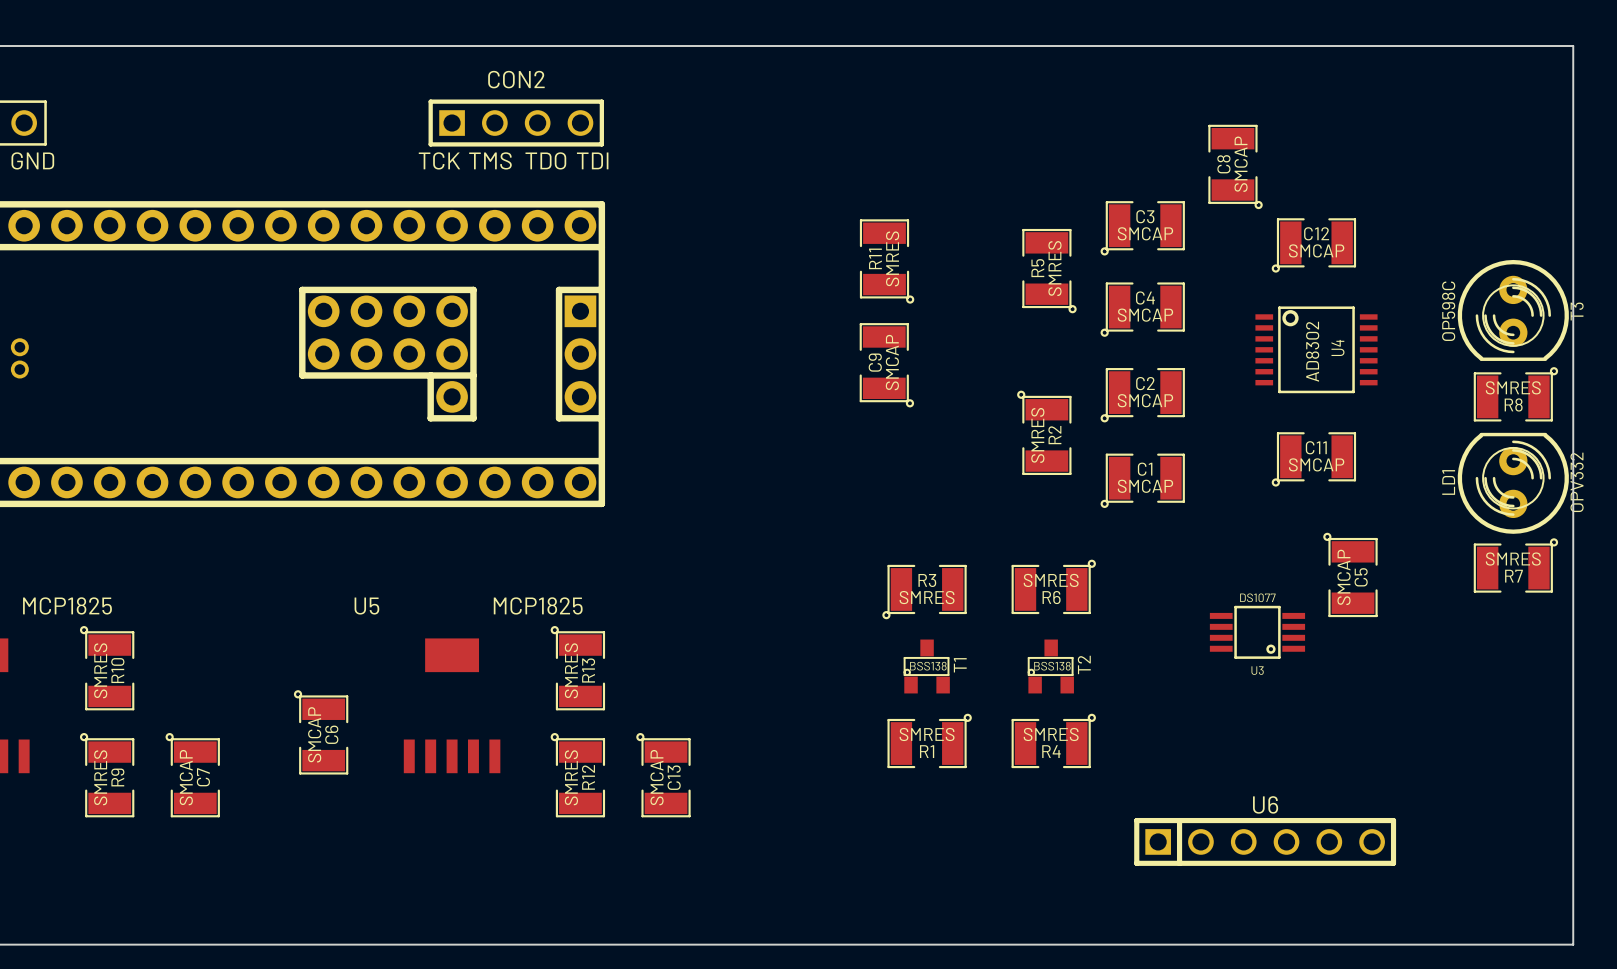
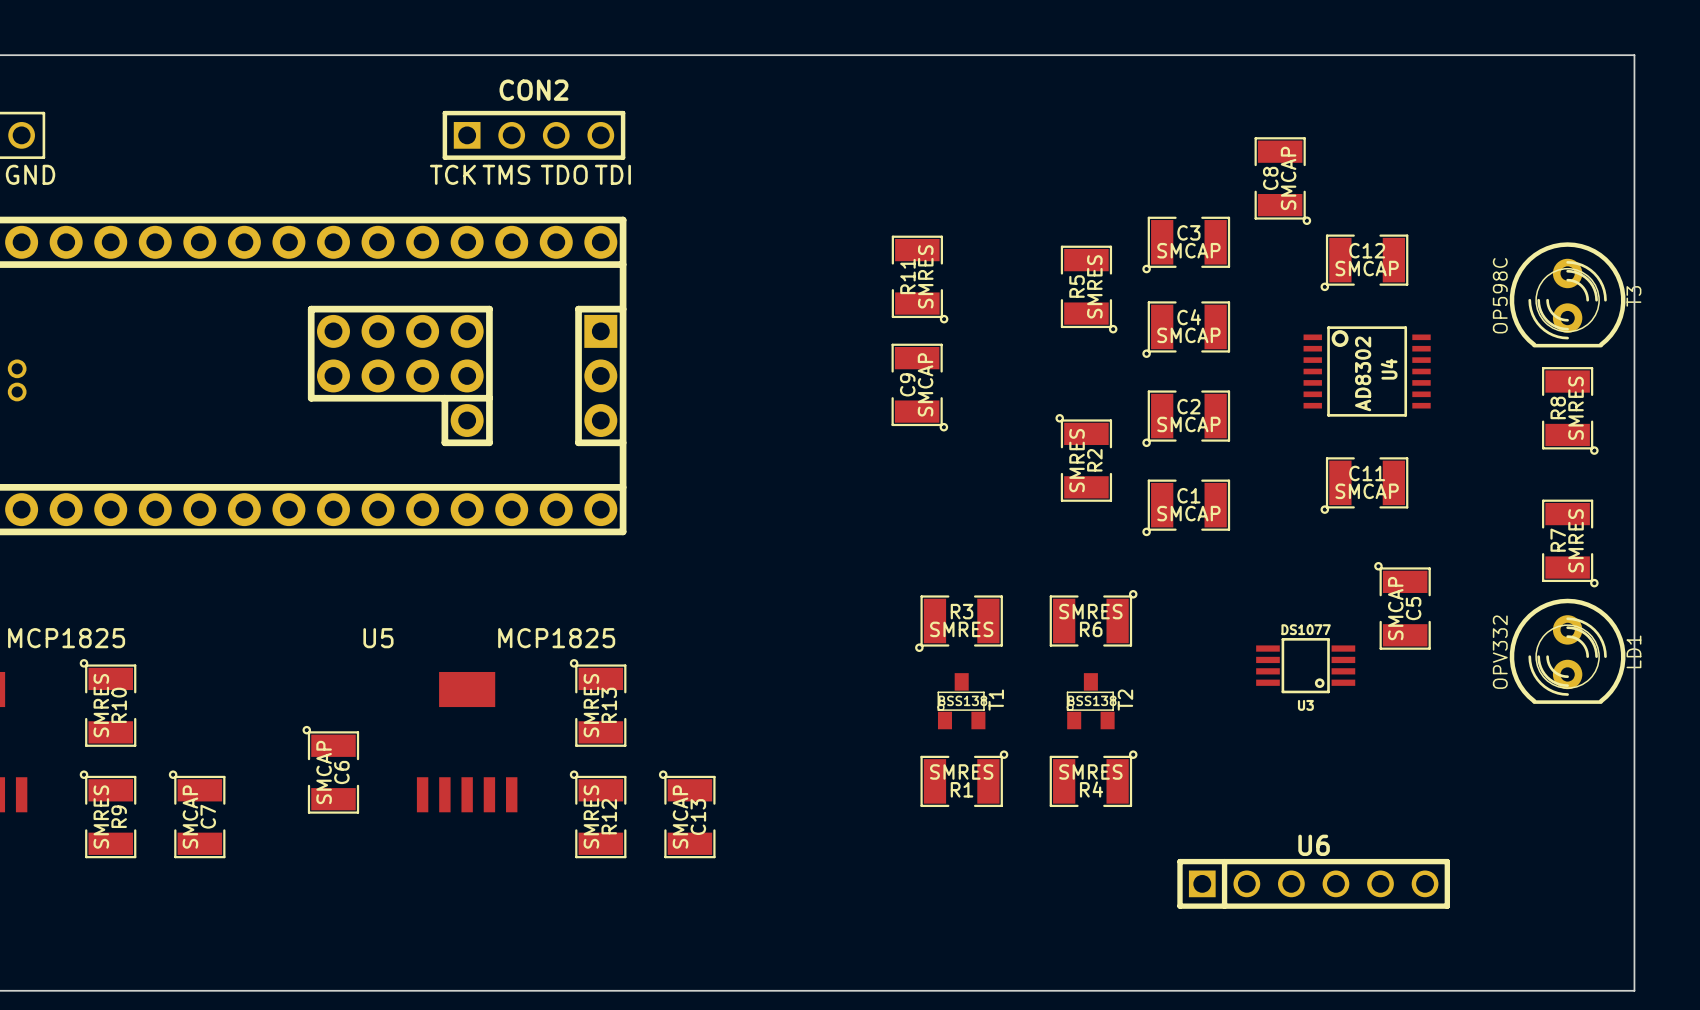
T3 position: (1513, 310) -> (1567, 294)
R8 rotation: 0° (1515, 394) -> 90° clockwise (1570, 410)
LD1 rotation: 0° (1513, 483) -> 180° (1567, 651)
LD1 position: (1513, 483) -> (1567, 651)
R7 rotation: 0° (1515, 565) -> 90° clockwise (1570, 543)
R7 position: (1515, 565) -> (1570, 543)

